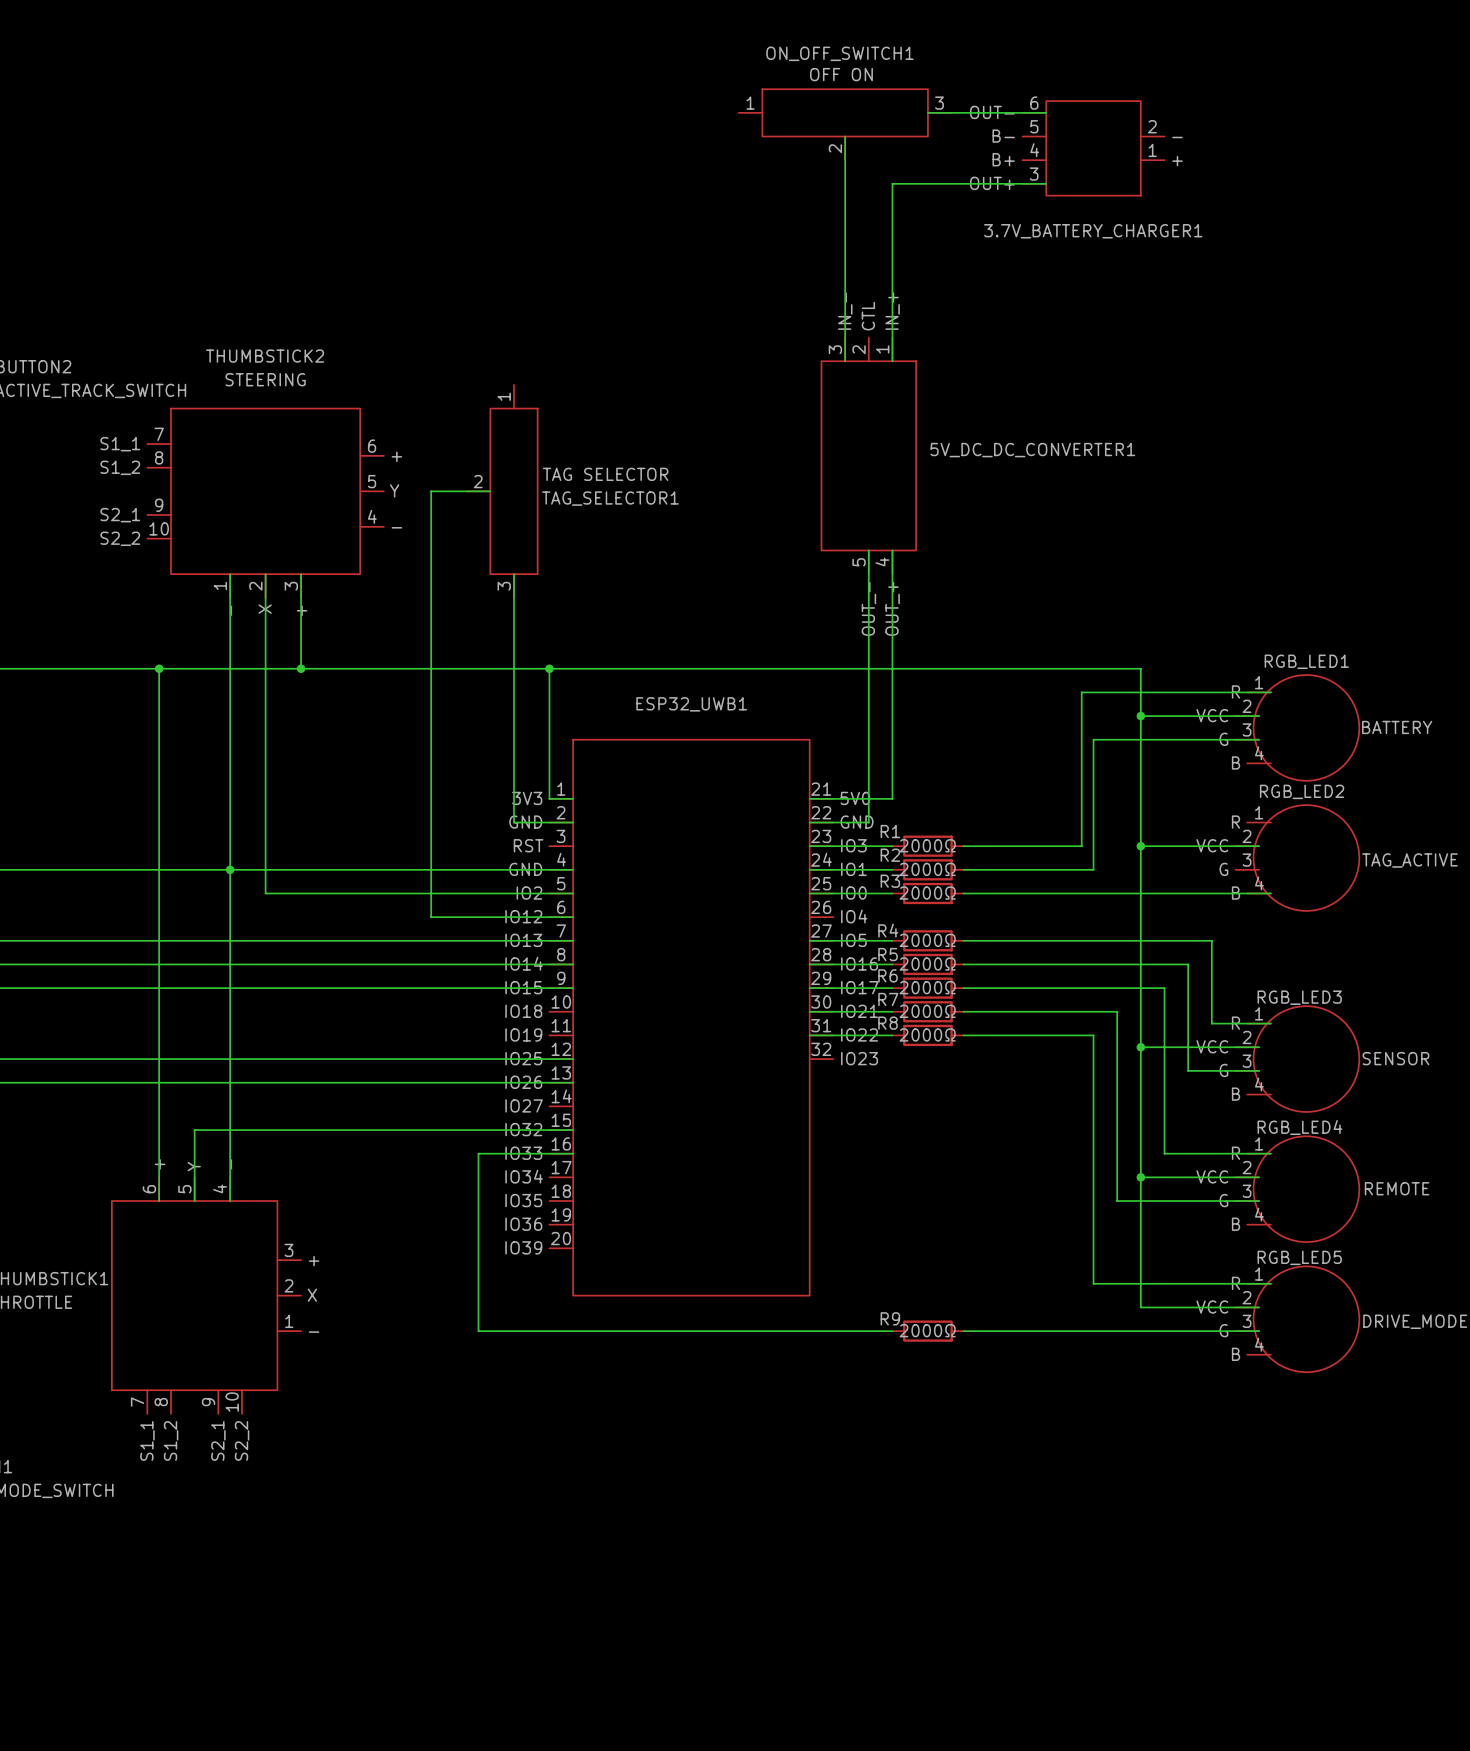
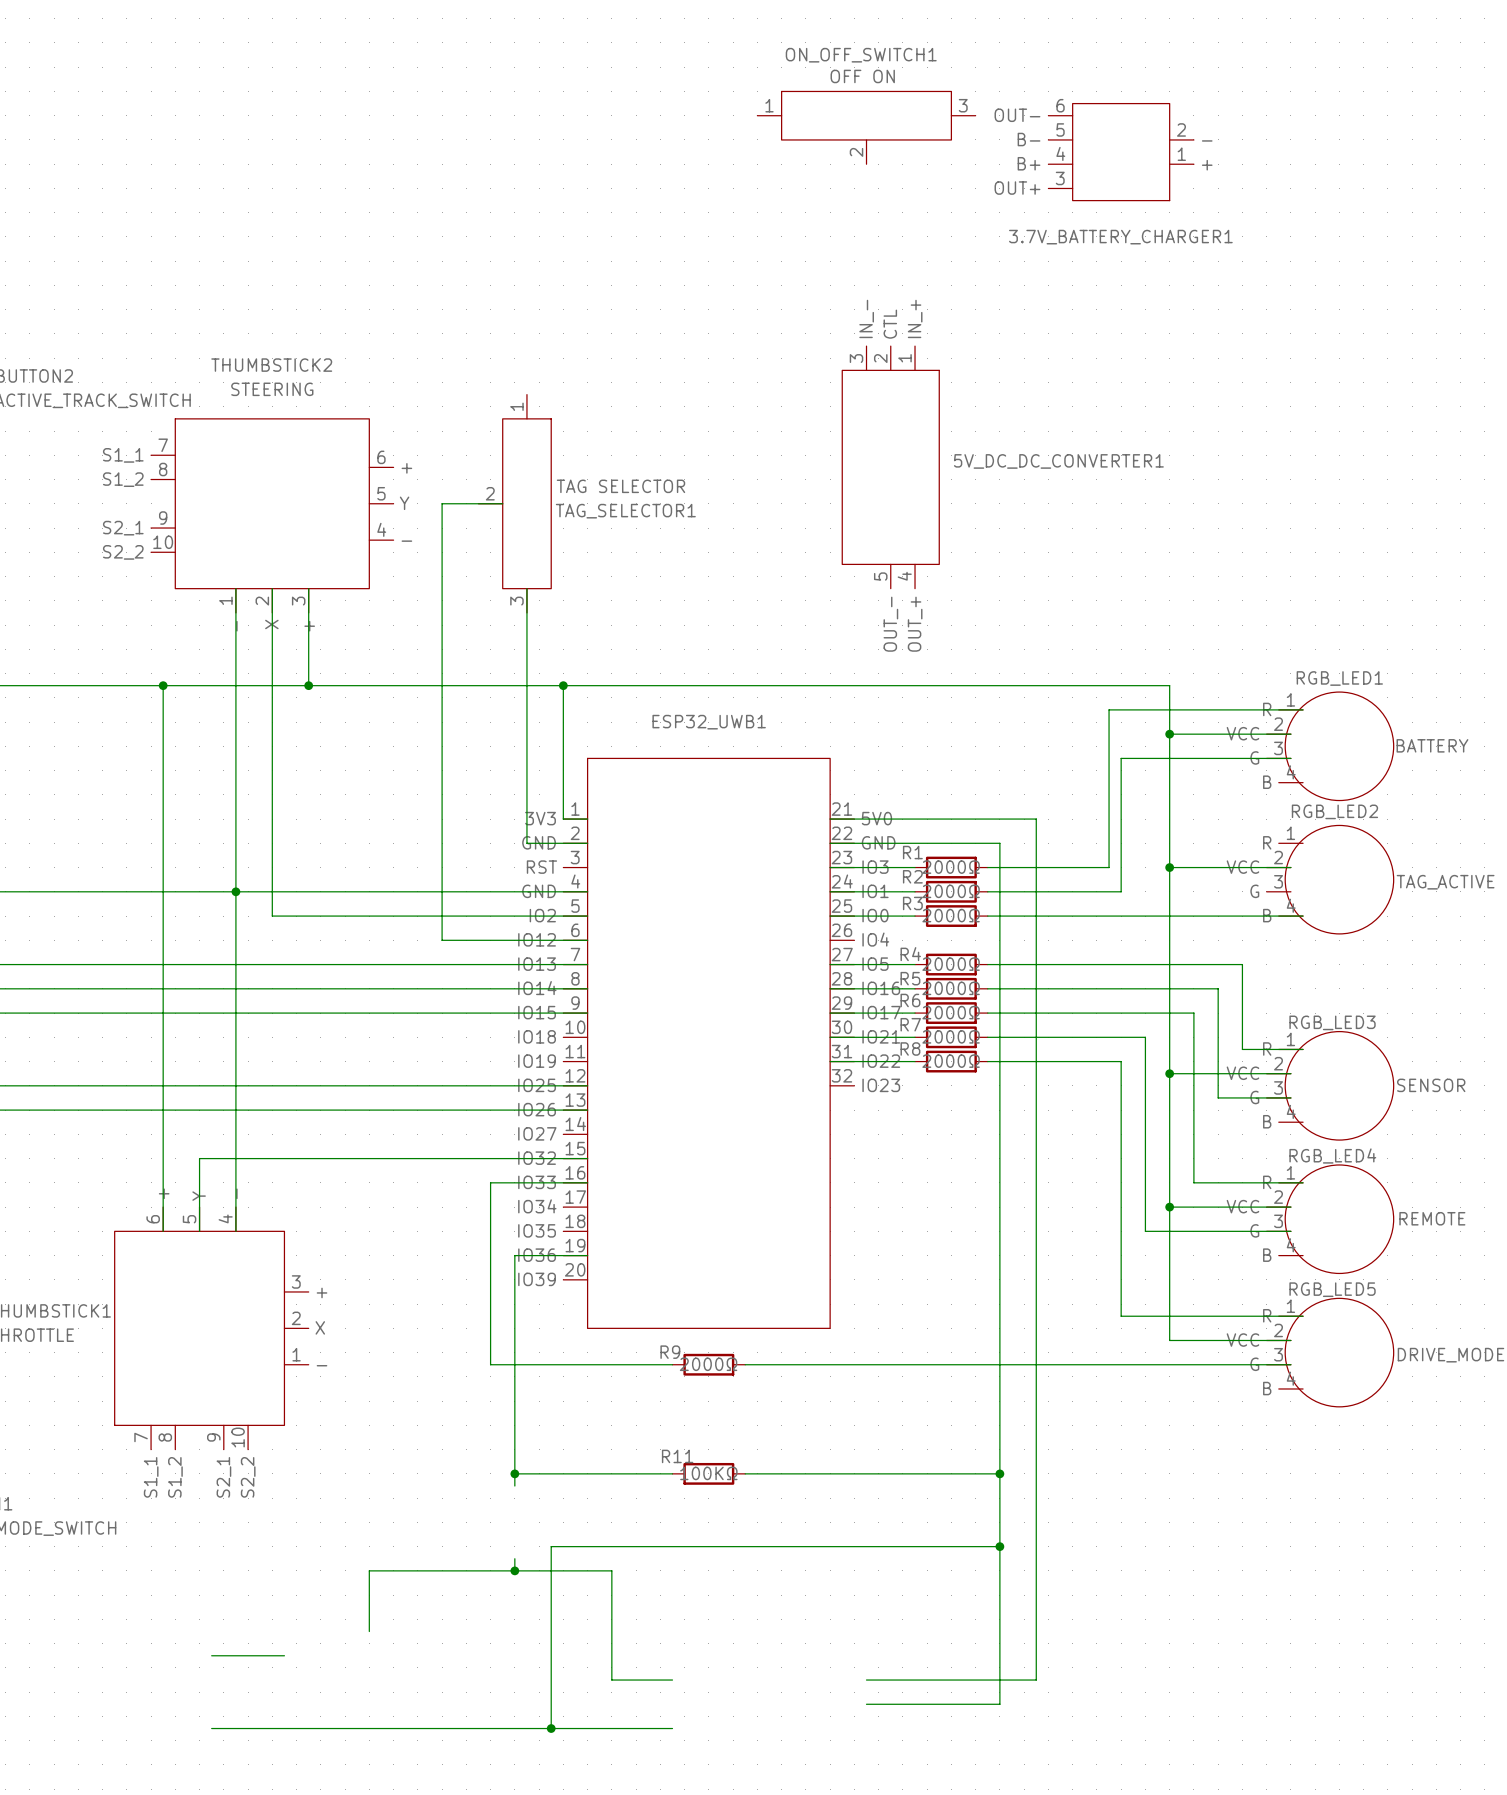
wire: (927, 112) (1046, 112) -> none
wire: (845, 136) (845, 361) -> none
wire: (1046, 183) (892, 183) (892, 361) -> none
wire: (868, 550) (868, 822) -> (866, 1704) (999, 1704) (999, 843) (890, 843)
wire: (892, 550) (892, 798) -> (866, 1680) (1036, 1680) (1036, 819) (915, 819)
wire: none -> (587, 1255) (514, 1255) (514, 1486)
R9 position: (927, 1331) -> (708, 1364)
wire: none -> (514, 1473) (672, 1473)
junction: none -> (514, 1473)
R11: none -> 100KΩ (708, 1473)
wire: none -> (745, 1473) (999, 1473)
junction: none -> (999, 1473)
wire: none -> (999, 1546) (551, 1546) (551, 1728)
junction: none -> (999, 1546)
wire: none -> (514, 1558) (514, 1570)
junction: none -> (514, 1570)
wire: none -> (369, 1631) (369, 1570) (611, 1570) (611, 1680) (672, 1680)
wire: none -> (211, 1655) (284, 1655)
wire: none -> (211, 1728) (672, 1728)
junction: none -> (551, 1728)

